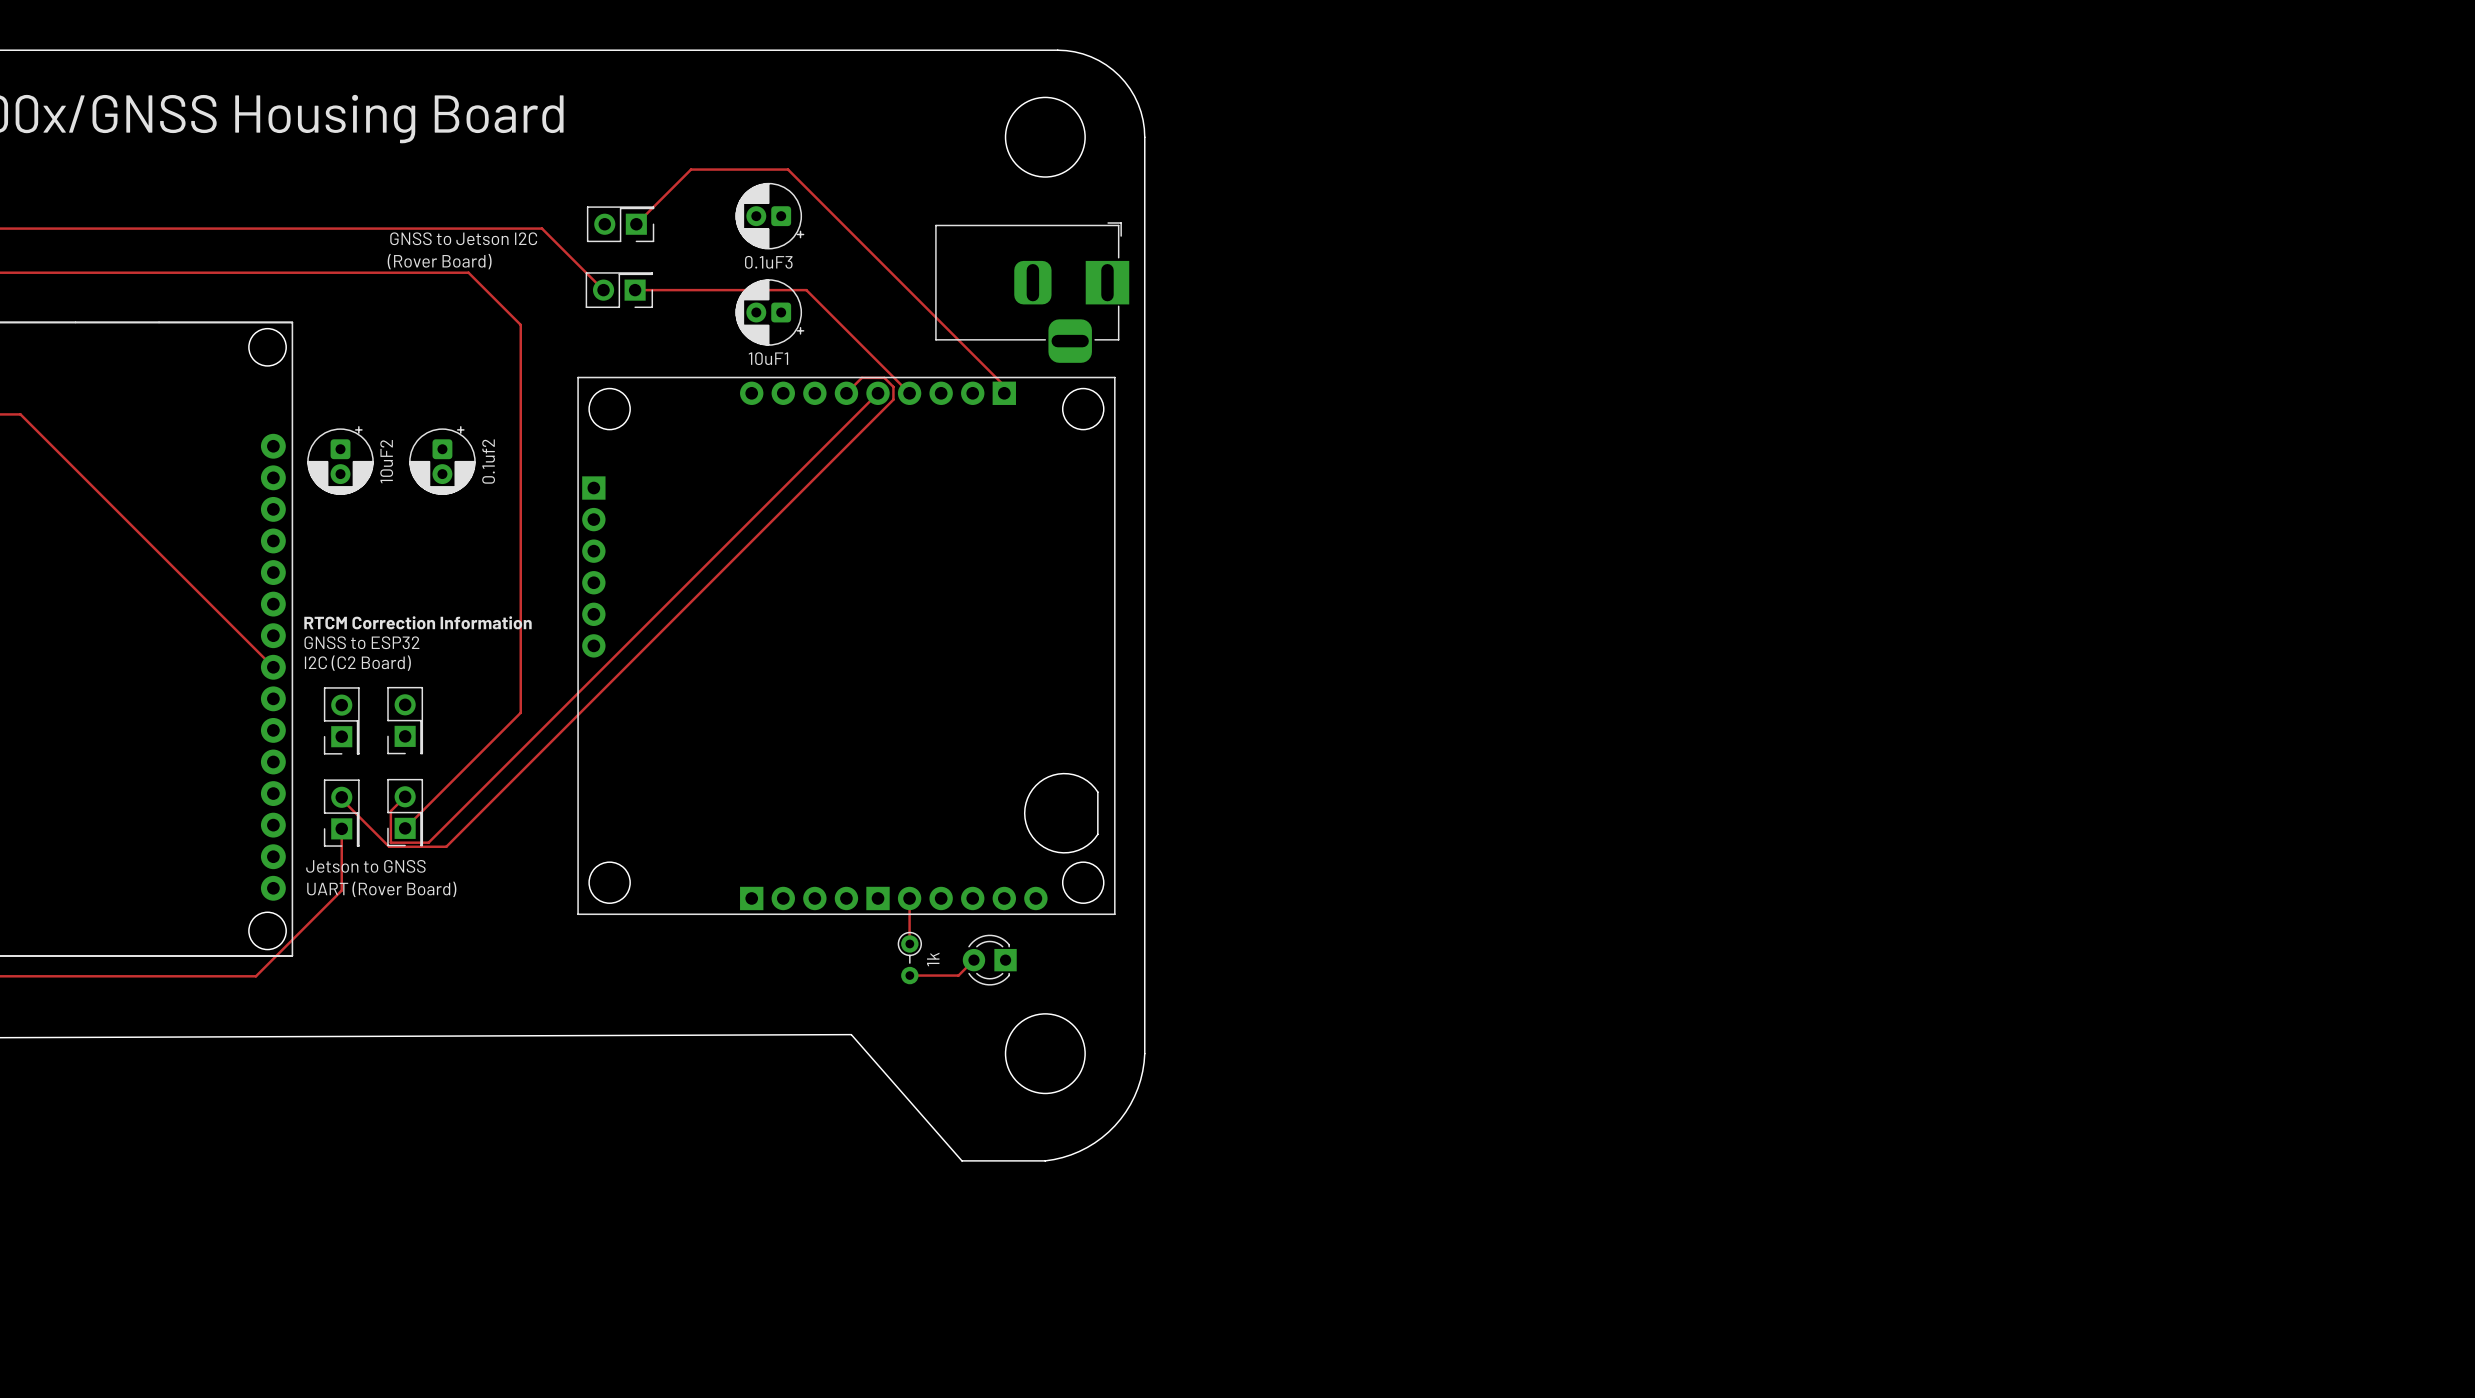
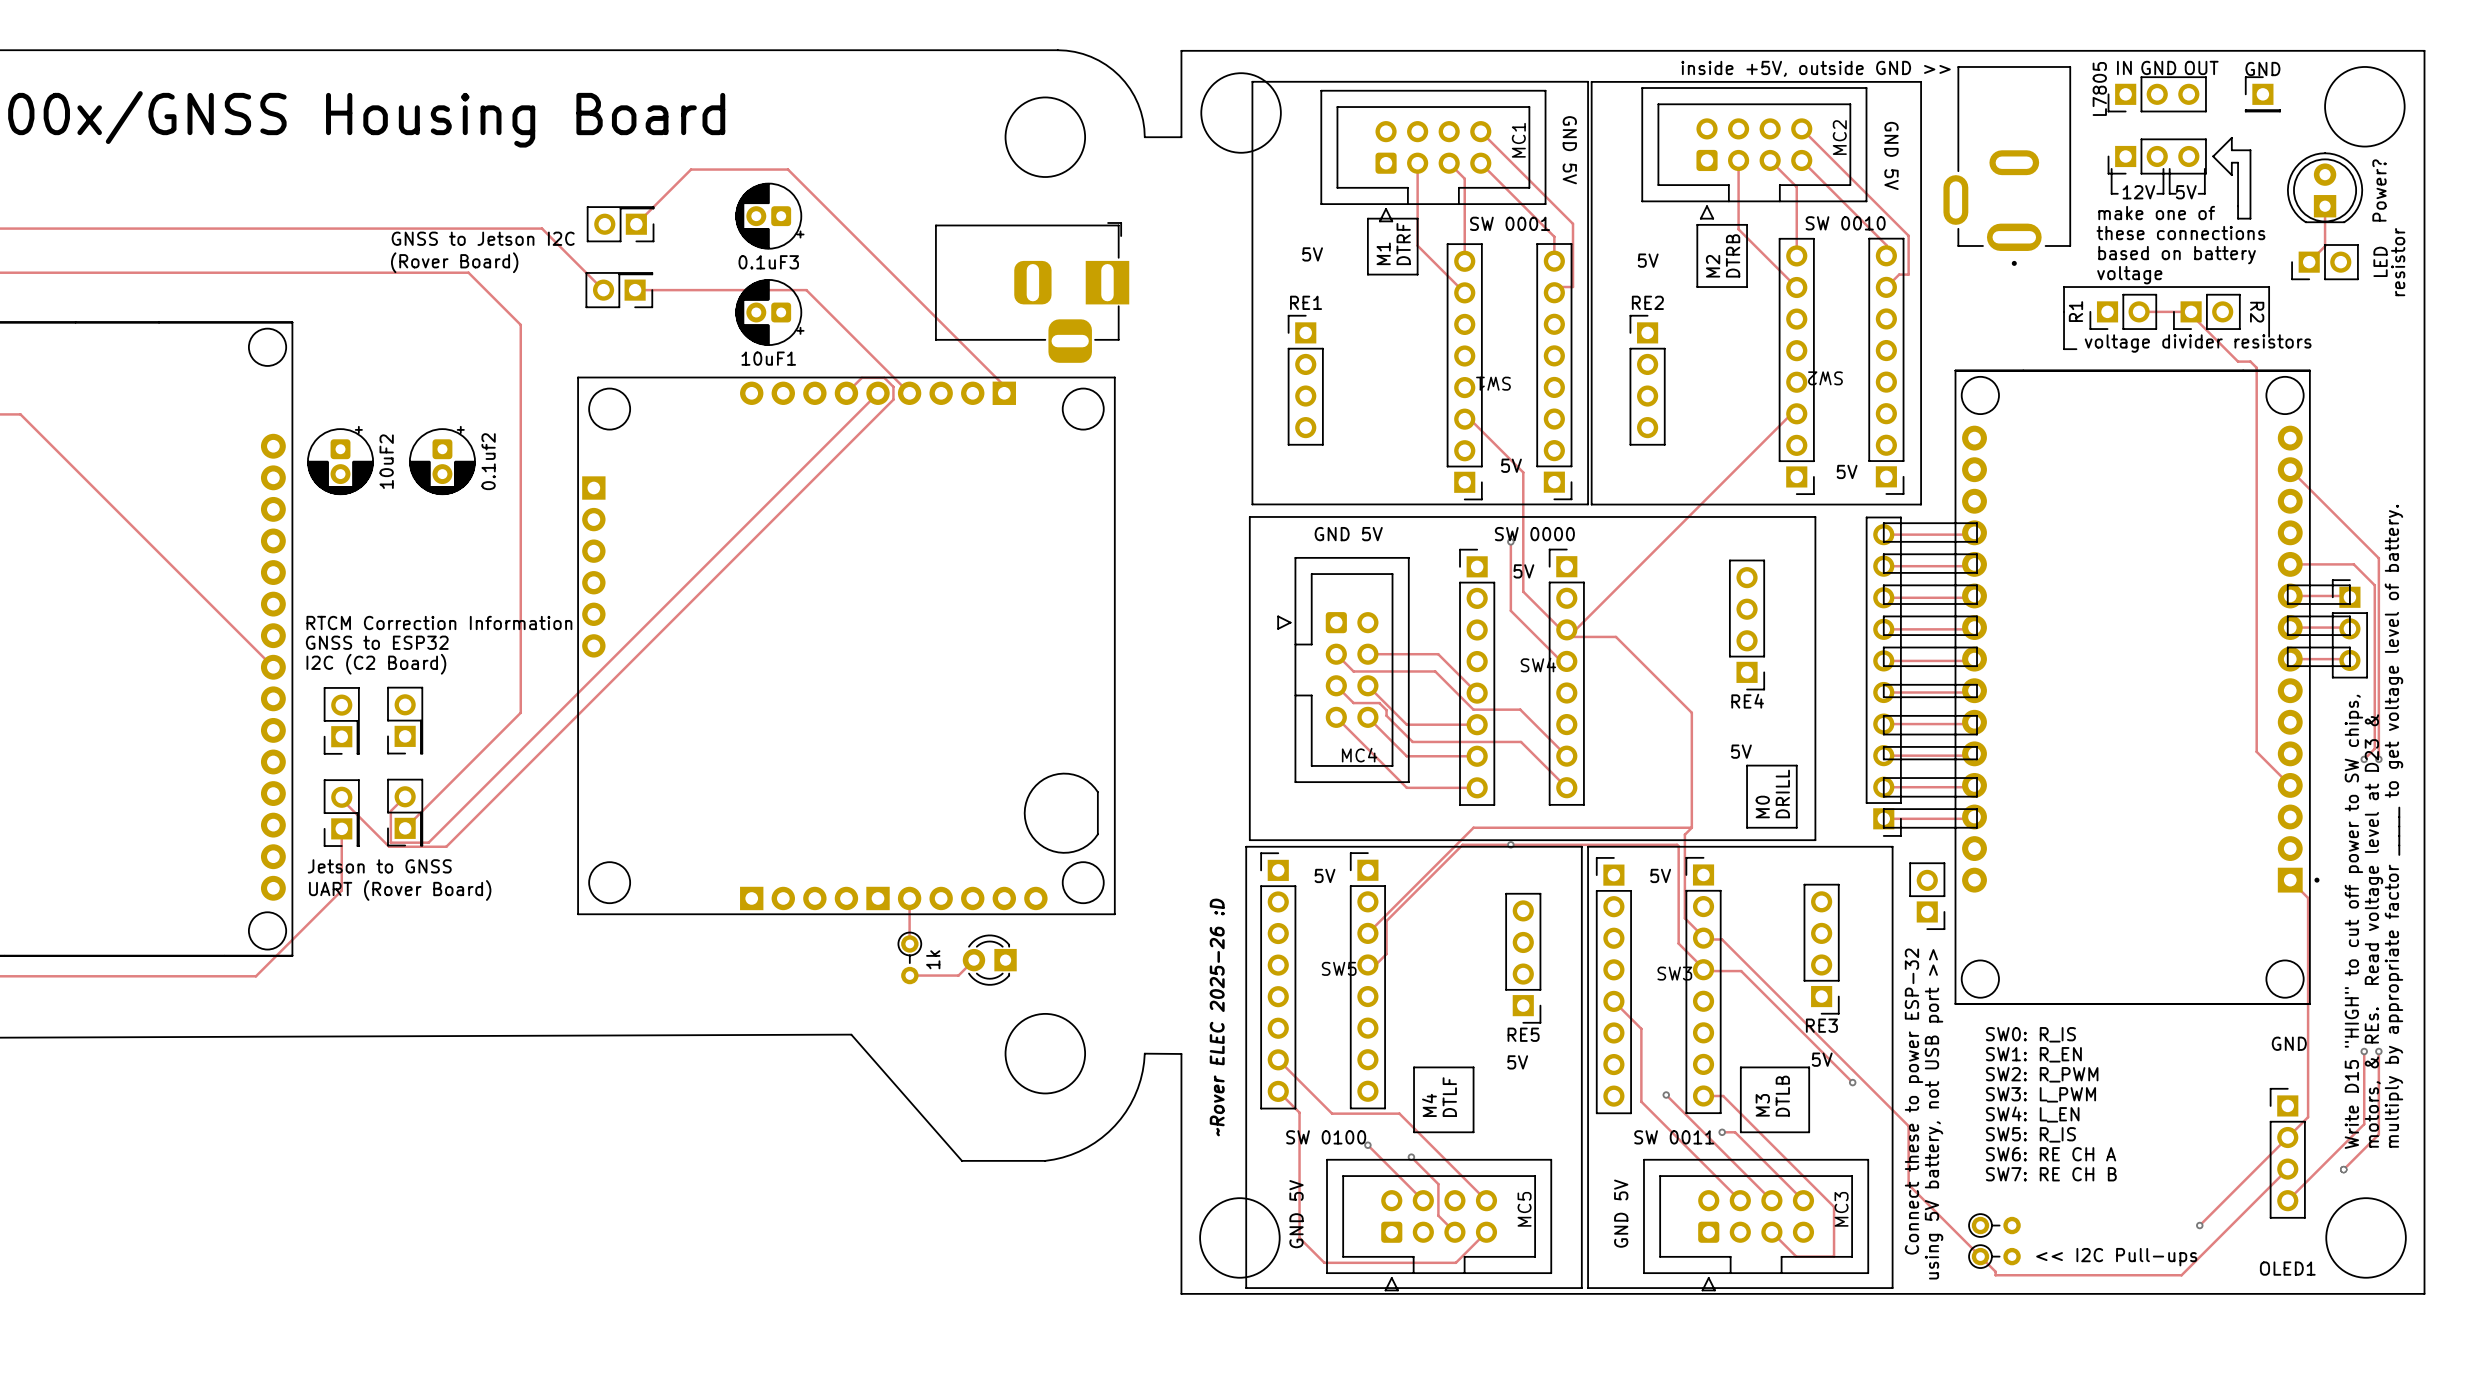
round board edge: none -> [2324, 66, 2405, 147]
text: none -> IN (2124, 67)
text: none -> GND (2158, 67)
text: none -> OUT (2201, 67)
text: none -> inside +5V, outside GND >> (1816, 68)
text: none -> GND (2262, 69)
round board edge: none -> [1200, 72, 1282, 154]
line: none -> (1252, 81) (1588, 81) (1588, 504) (1252, 504) (1252, 81)
line: none -> (1591, 81) (1921, 81) (1921, 504) (1591, 504) (1591, 81)
part: none -> (2157, 94)
part: none -> (2262, 94)
text: none -> L7805 (2099, 88)
track: none -> (1801, 128) (1908, 235) (1908, 274) (1899, 274) (1886, 287)
track: none -> (1480, 131) (1573, 223) (1573, 287) (1560, 287) (1554, 292)
board edge: (1144, 137) (1144, 1062) (1134, 1096) (1114, 1125) (1087, 1147) (1071, 1154) (1045, 1160) -> (1144, 137) (1181, 137) (1181, 50) (2424, 50) (2424, 1293) (1181, 1293) (1181, 1053) (1144, 1053) (1137, 1088) (1130, 1104) (1114, 1125) (1101, 1137) (1079, 1151) (1045, 1160)
text: none -> GND 5V (1569, 150)
text: none -> GND 5V (1891, 155)
MC2: none -> (1754, 153)
MC1: none -> (1433, 156)
part: none -> (2157, 156)
line: none -> (2213, 156) (2231, 137) (2231, 150) (2250, 150) (2250, 218) (2238, 218) (2238, 162) (2231, 162) (2231, 175) (2213, 156)
track: none -> (1738, 160) (1738, 229) (1796, 287)
track: none -> (1770, 160) (1796, 187) (1796, 255)
track: none -> (1801, 160) (1886, 245) (1886, 255)
track: none -> (1417, 163) (1417, 245) (1464, 292)
track: none -> (1449, 163) (1464, 178) (1464, 261)
track: none -> (1480, 163) (1554, 236) (1554, 261)
part: none -> (2007, 166)
line: none -> (2111, 168) (2111, 193) (2117, 193)
line: none -> (2163, 168) (2163, 193) (2157, 193)
line: none -> (2169, 168) (2169, 193) (2175, 193)
line: none -> (2204, 168) (2204, 193) (2198, 193)
part: none -> (2325, 187)
text: none -> 12V 5V (2159, 192)
text: none -> Power? (2379, 190)
track: none -> (2325, 206) (2325, 246) (2309, 262)
text: none -> make one of (2156, 213)
line: none -> (1367, 218) (1417, 218) (1417, 274) (1367, 274) (1367, 218)
text: none -> SW 0001 (1510, 223)
text: none -> SW 0010 (1845, 223)
line: none -> (1697, 224) (1747, 224) (1747, 287) (1697, 287) (1697, 224)
text: none -> these connections (2180, 233)
text: none -> DTRF (1403, 244)
text: none -> 5V (1312, 254)
text: none -> based on battery (2177, 255)
text: none -> M1 (1383, 253)
text: none -> DTRB (1733, 255)
text: none -> 5V (1648, 260)
text: none -> LED (2380, 261)
part: none -> (2325, 262)
text: none -> resistor (2398, 262)
text: none -> M2 (1713, 266)
text: none -> voltage (2129, 275)
text: none -> R1 (2075, 311)
part: none -> (2123, 311)
track: none -> (2139, 311) (2191, 311) (2191, 314) (2238, 361) (2250, 361) (2256, 367) (2256, 751) (2290, 785)
part: none -> (2206, 311)
text: none -> R2 (2257, 312)
line: none -> (2269, 336) (2269, 287) (2064, 287) (2064, 349) (2076, 349)
text: none -> voltage divider resistors (2198, 343)
SW2: none -> (1841, 366)
SW1: none -> (1509, 371)
RE1: none -> (1305, 380)
RE2: none -> (1647, 380)
track: none -> (1796, 412) (1792, 412) (1568, 636)
track: none -> (1464, 413) (1523, 472) (1523, 591) (1568, 636)
text: none -> 5V (1511, 465)
track: none -> (2290, 469) (2378, 558) (2378, 759)
text: none -> 5V (1847, 471)
line: none -> (1249, 516) (1815, 516) (1815, 840) (1249, 840) (1249, 516)
line: none -> (1883, 523) (1977, 523) (1977, 541) (1883, 541) (1883, 523)
track: none -> (1974, 532) (1972, 534) (1883, 534)
text: none -> GND 5V (1348, 534)
text: none -> SW 0000 (1534, 534)
track: none -> (1510, 541) (1510, 610) (1568, 668)
via: none -> (1510, 541)
line: none -> (1883, 554) (1883, 572) (1977, 572) (1977, 554) (1883, 554)
track: none -> (1974, 564) (1972, 566) (1883, 566)
track: none -> (2290, 564) (2353, 564) (2374, 585) (2374, 748) (2364, 759)
text: none -> 5V (1523, 571)
line: none -> (1883, 585) (1883, 603) (1977, 603) (1977, 585) (1883, 585)
line: none -> (2287, 585) (2287, 603) (2349, 603) (2349, 585) (2287, 585)
track: none -> (1974, 595) (1972, 597) (1883, 597)
track: none -> (2290, 595) (2349, 597)
line: none -> (1883, 616) (1883, 635) (1977, 635) (1977, 616) (1883, 616)
line: none -> (2287, 616) (2287, 635) (2349, 635) (2349, 616) (2287, 616)
RE4: none -> (1747, 625)
track: none -> (1974, 627) (1972, 629) (1883, 629)
track: none -> (2290, 627) (2349, 628)
part: none -> (2349, 628)
track: none -> (1568, 636) (1615, 636) (1691, 712) (1691, 827)
line: none -> (1883, 647) (1883, 666) (1977, 666) (1977, 647) (1883, 647)
line: none -> (2287, 647) (2349, 647) (2349, 666) (2287, 666) (2287, 647)
track: none -> (1336, 654) (1353, 671) (1435, 671) (1473, 709) (1520, 709) (1566, 756)
track: none -> (1367, 654) (1438, 654) (1477, 693)
track: none -> (1974, 659) (1972, 660) (1883, 660)
track: none -> (2290, 659) (2349, 660)
MC4: none -> (1343, 670)
part: none -> (1883, 676)
SW4: none -> (1521, 677)
line: none -> (1883, 684) (1883, 697) (1977, 697) (1977, 684) (1883, 684)
track: none -> (1336, 685) (1353, 703) (1379, 703) (1386, 710) (1386, 715) (1412, 741) (1521, 741) (1566, 787)
track: none -> (1367, 685) (1406, 724) (1477, 724)
part: none -> (2137, 687)
track: none -> (1974, 690) (1972, 692) (1883, 692)
line: none -> (1883, 715) (1883, 734) (1977, 734) (1977, 715) (1883, 715)
track: none -> (1336, 717) (1406, 787) (1477, 787)
track: none -> (1367, 717) (1406, 756) (1477, 756)
track: none -> (1974, 722) (1972, 724) (1883, 724)
line: none -> (1883, 746) (1883, 759) (1977, 759) (1977, 746) (1883, 746)
text: none -> 5V (1741, 751)
track: none -> (1974, 753) (1972, 755) (1883, 755)
via: none -> (2364, 759)
via: none -> (2378, 759)
line: none -> (1747, 765) (1747, 827) (1796, 827) (1796, 765) (1747, 765)
line: none -> (1883, 778) (1883, 796) (1977, 796) (1977, 778) (1883, 778)
track: none -> (1974, 785) (1972, 787) (1883, 787)
text: none -> DRILL (1782, 793)
text: none -> M0 (1762, 806)
line: none -> (1883, 809) (1883, 827) (1977, 827) (1977, 809) (1883, 809)
track: none -> (1974, 816) (1972, 818) (1883, 818)
track: none -> (1691, 827) (1473, 827) (1370, 930) (1370, 938)
track: none -> (1691, 827) (1684, 834) (1684, 918) (1706, 939) (1722, 939) (1908, 1126) (1908, 1184) (1995, 1271) (1995, 1275) (2181, 1275) (2287, 1169)
via: none -> (1510, 844)
line: none -> (1246, 846) (1581, 846) (1581, 1288) (1246, 1288) (1246, 846)
line: none -> (1588, 846) (1892, 846) (1892, 1288) (1588, 1288) (1588, 846)
text: none -> 5V (1325, 875)
text: none -> 5V (1660, 875)
track: none -> (2290, 880) (2308, 897) (2308, 1117) (2199, 1225)
part: none -> (1927, 896)
text: none -> multiply by appropriate factor _____ to get voltage level of battery. (2393, 826)
RE3: none -> (1821, 949)
RE5: none -> (1523, 958)
track: none -> (1370, 970) (1386, 954) (1386, 920) (1462, 844) (1677, 844) (1678, 846) (1678, 943) (1706, 971) (1741, 971) (1852, 1082)
text: none -> Write D15 "HIGH" to cut off power to SW chips, (2353, 921)
SW5: none -> (1323, 980)
SW3: none -> (1658, 985)
text: none -> motors, & REs. Read voltage level at D23 & (2373, 930)
track: none -> (1613, 1001) (1641, 1028) (1641, 1101) (1740, 1200)
text: none -> SW0: R_IS (2030, 1034)
text: none -> ~Rover ELEC 2025-26 :D (1217, 1017)
text: none -> GND (2289, 1043)
track: none -> (2364, 1051) (2364, 1124) (2281, 1206)
via: none -> (2364, 1051)
track: none -> (2378, 1051) (2378, 1134) (2343, 1169)
via: none -> (2378, 1051)
text: none -> SW1: R_EN (2033, 1054)
track: none -> (1278, 1059) (1332, 1113) (1399, 1113) (1486, 1200)
text: none -> 5V (1822, 1059)
text: none -> 5V (1517, 1062)
line: none -> (1414, 1067) (1473, 1067) (1473, 1132) (1414, 1132) (1414, 1067)
line: none -> (1740, 1067) (1809, 1067) (1809, 1132) (1740, 1132) (1740, 1067)
text: none -> Connect these to power ESP-32 (1914, 1101)
text: none -> using 5V battery, not USB port >> (1934, 1114)
text: none -> SW2: R_PWM (2042, 1074)
via: none -> (1852, 1082)
track: none -> (1278, 1091) (1299, 1112) (1299, 1237) (1324, 1262) (1455, 1262) (1486, 1232)
text: none -> SW3: L_PWM (2040, 1094)
track: none -> (1666, 1095) (1771, 1200)
via: none -> (1666, 1095)
track: none -> (1703, 1096) (1723, 1096) (1834, 1206) (1834, 1256) (1796, 1256) (1771, 1232)
text: none -> DTLF (1449, 1097)
text: none -> DTLB (1782, 1096)
text: none -> M4 (1429, 1105)
text: none -> M3 (1762, 1105)
text: none -> SW4: L_EN (2032, 1114)
track: none -> (1722, 1132) (1735, 1132) (1803, 1200)
via: none -> (1722, 1132)
text: none -> SW5: R_IS (2030, 1134)
text: none -> SW 0100 (1326, 1137)
text: none -> SW 0011 (1674, 1137)
track: none -> (1367, 1145) (1423, 1200)
via: none -> (1367, 1145)
OLED1: none -> (2287, 1153)
text: none -> SW6: RE CH A (2051, 1154)
track: none -> (1411, 1157) (1438, 1184) (1438, 1215) (1454, 1232)
via: none -> (1411, 1157)
via: none -> (2343, 1169)
text: none -> SW7: RE CH B (2051, 1174)
round board edge: none -> [1199, 1197, 1280, 1279]
round board edge: none -> [2325, 1197, 2407, 1279]
text: none -> GND 5V (1621, 1213)
text: none -> GND 5V (1296, 1214)
MC5: none -> (1439, 1225)
MC3: none -> (1756, 1225)
part: none -> (1994, 1225)
via: none -> (2199, 1225)
part: none -> (1994, 1256)
text: none -> << I2C Pull-ups (2116, 1257)

